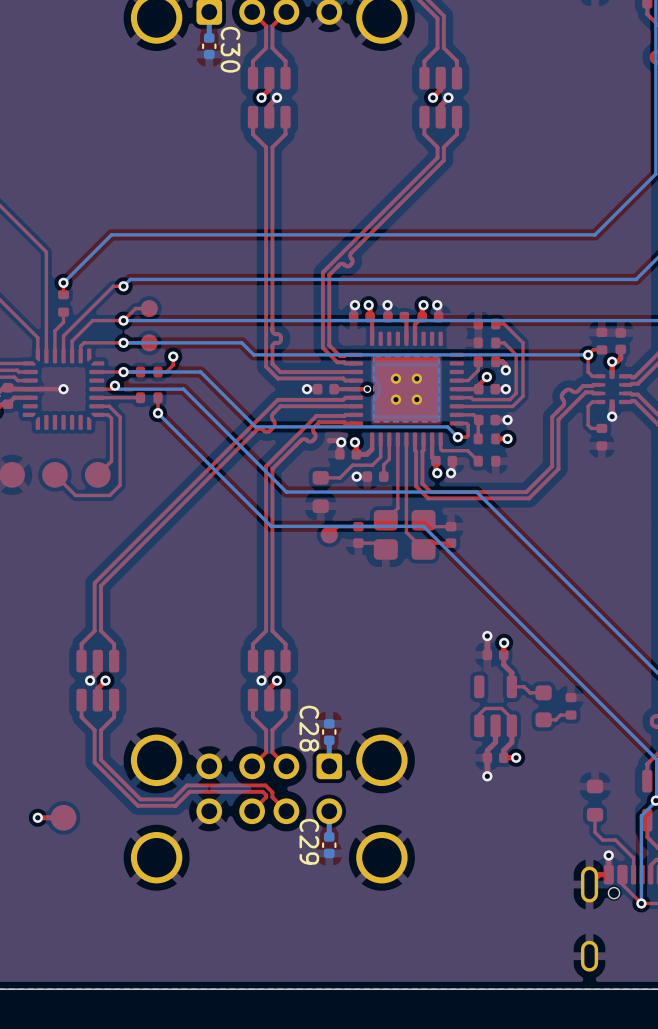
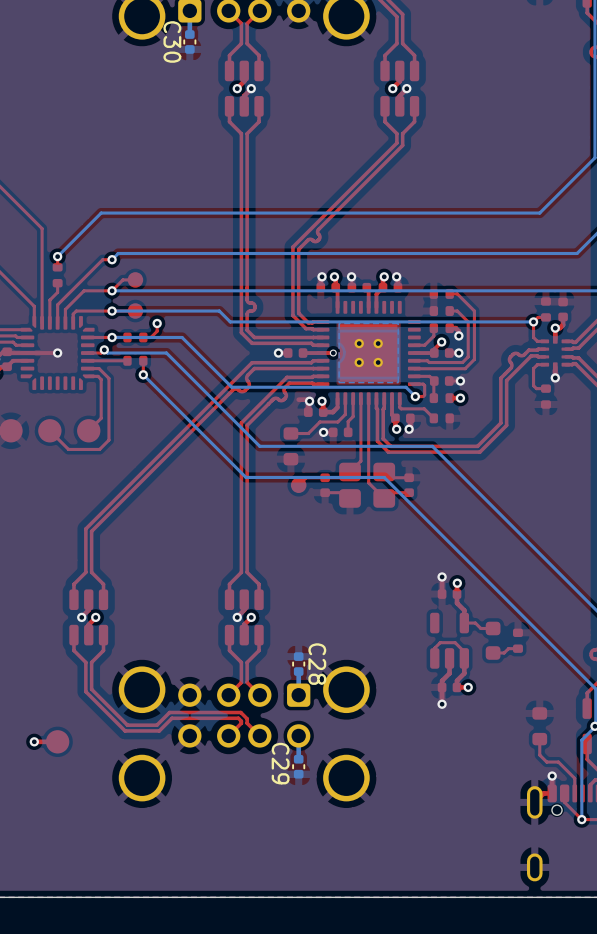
C30 name position: C30 (230, 49) -> C30 (172, 41)
C28 name position: C28 (309, 728) -> C28 (317, 664)

